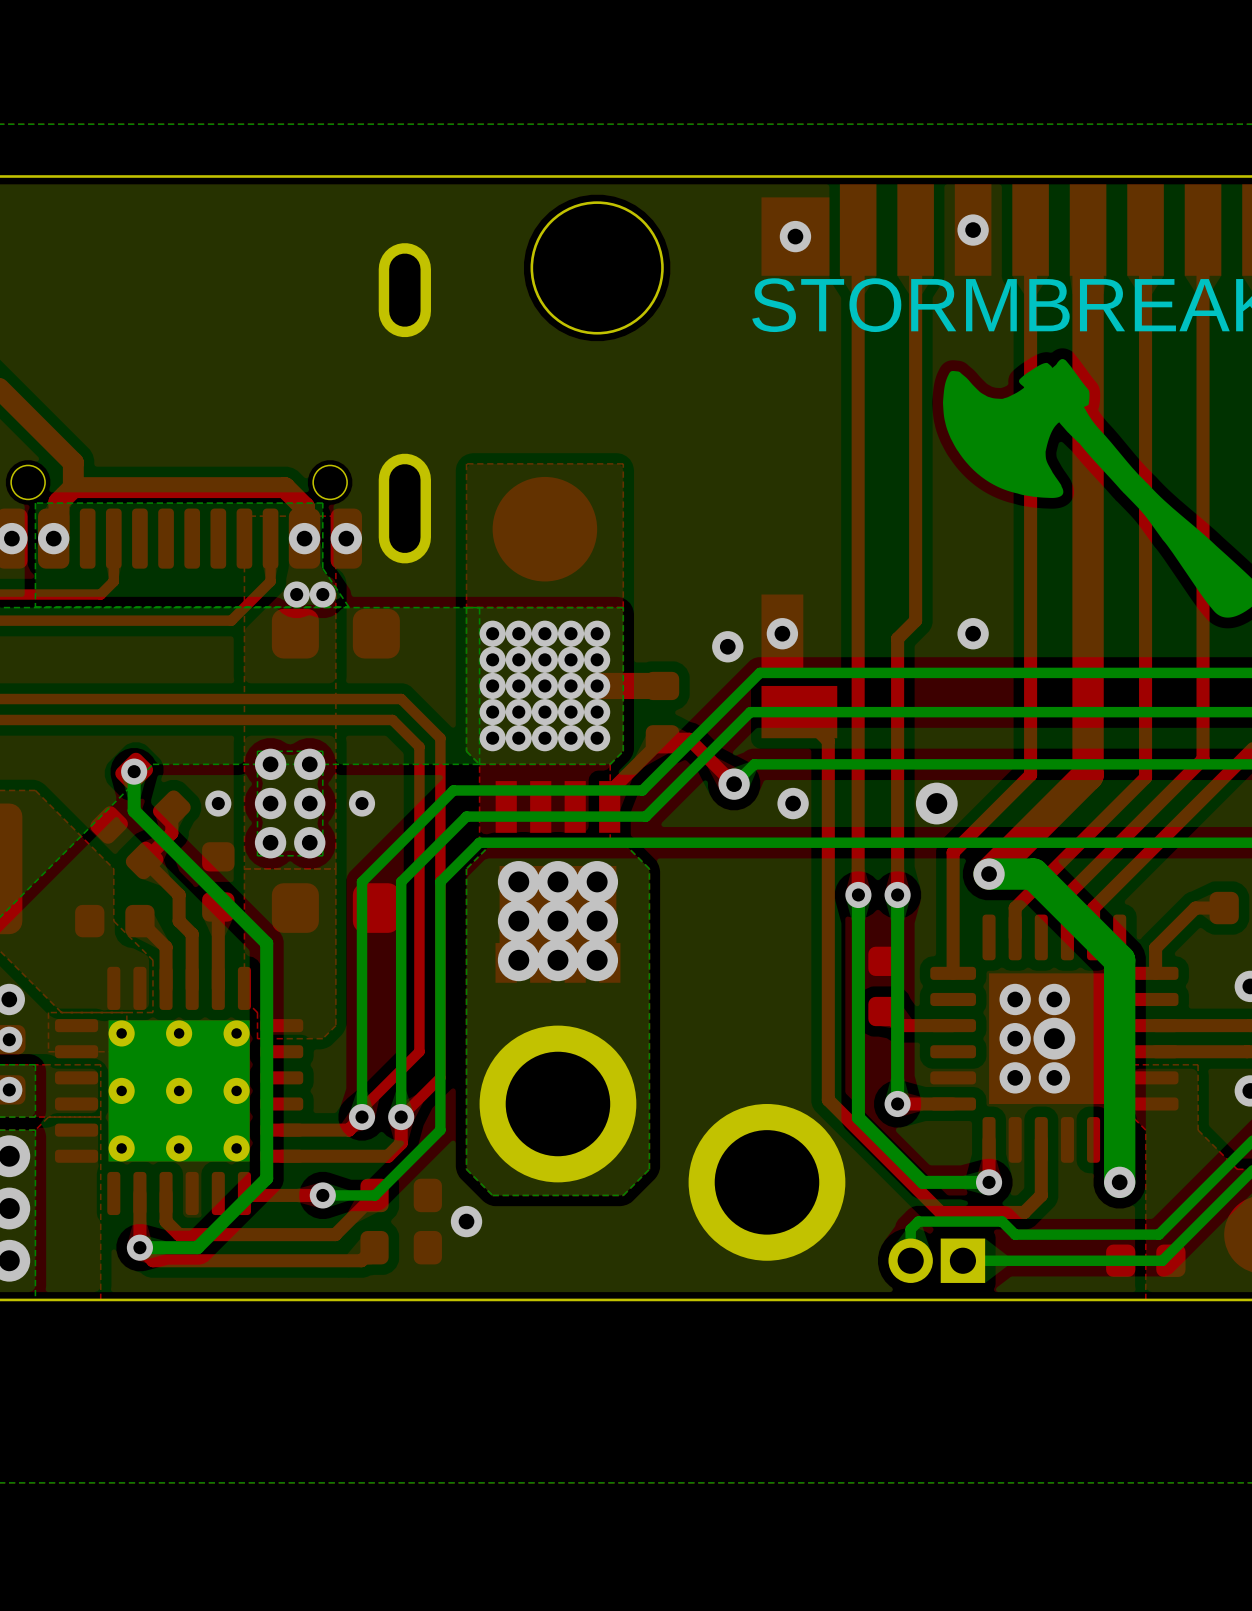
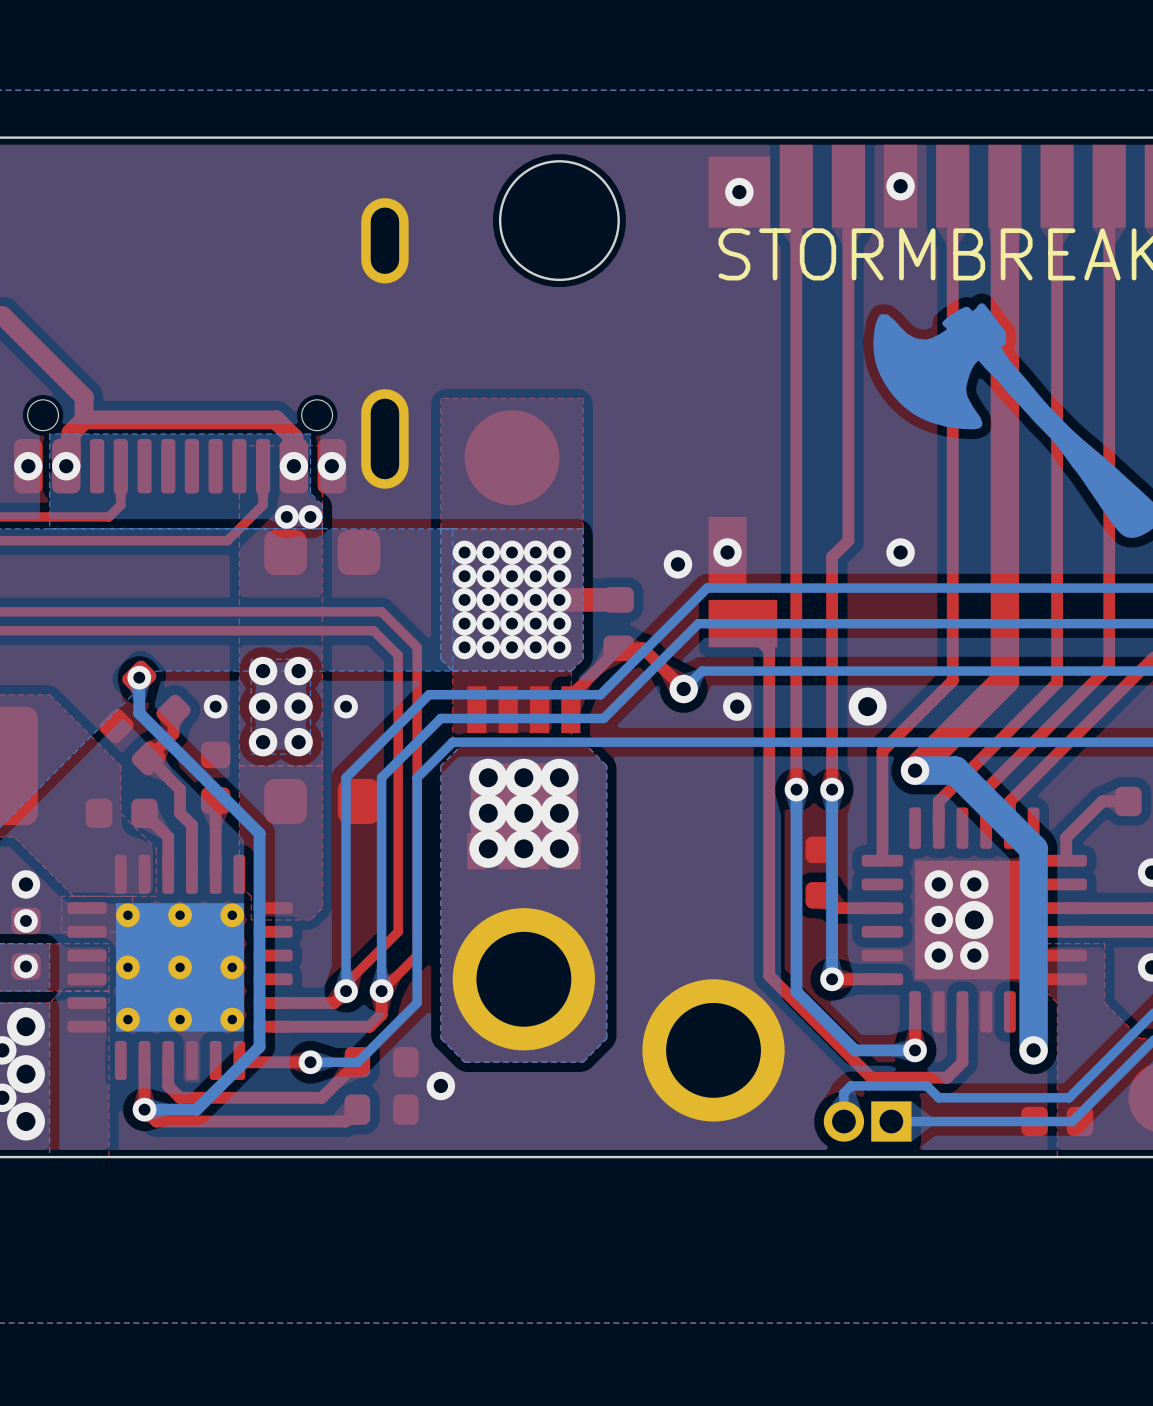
bottom zone outline: (322, 568) (348, 607) (35, 607) -> (310, 493) (322, 505) (322, 528)

